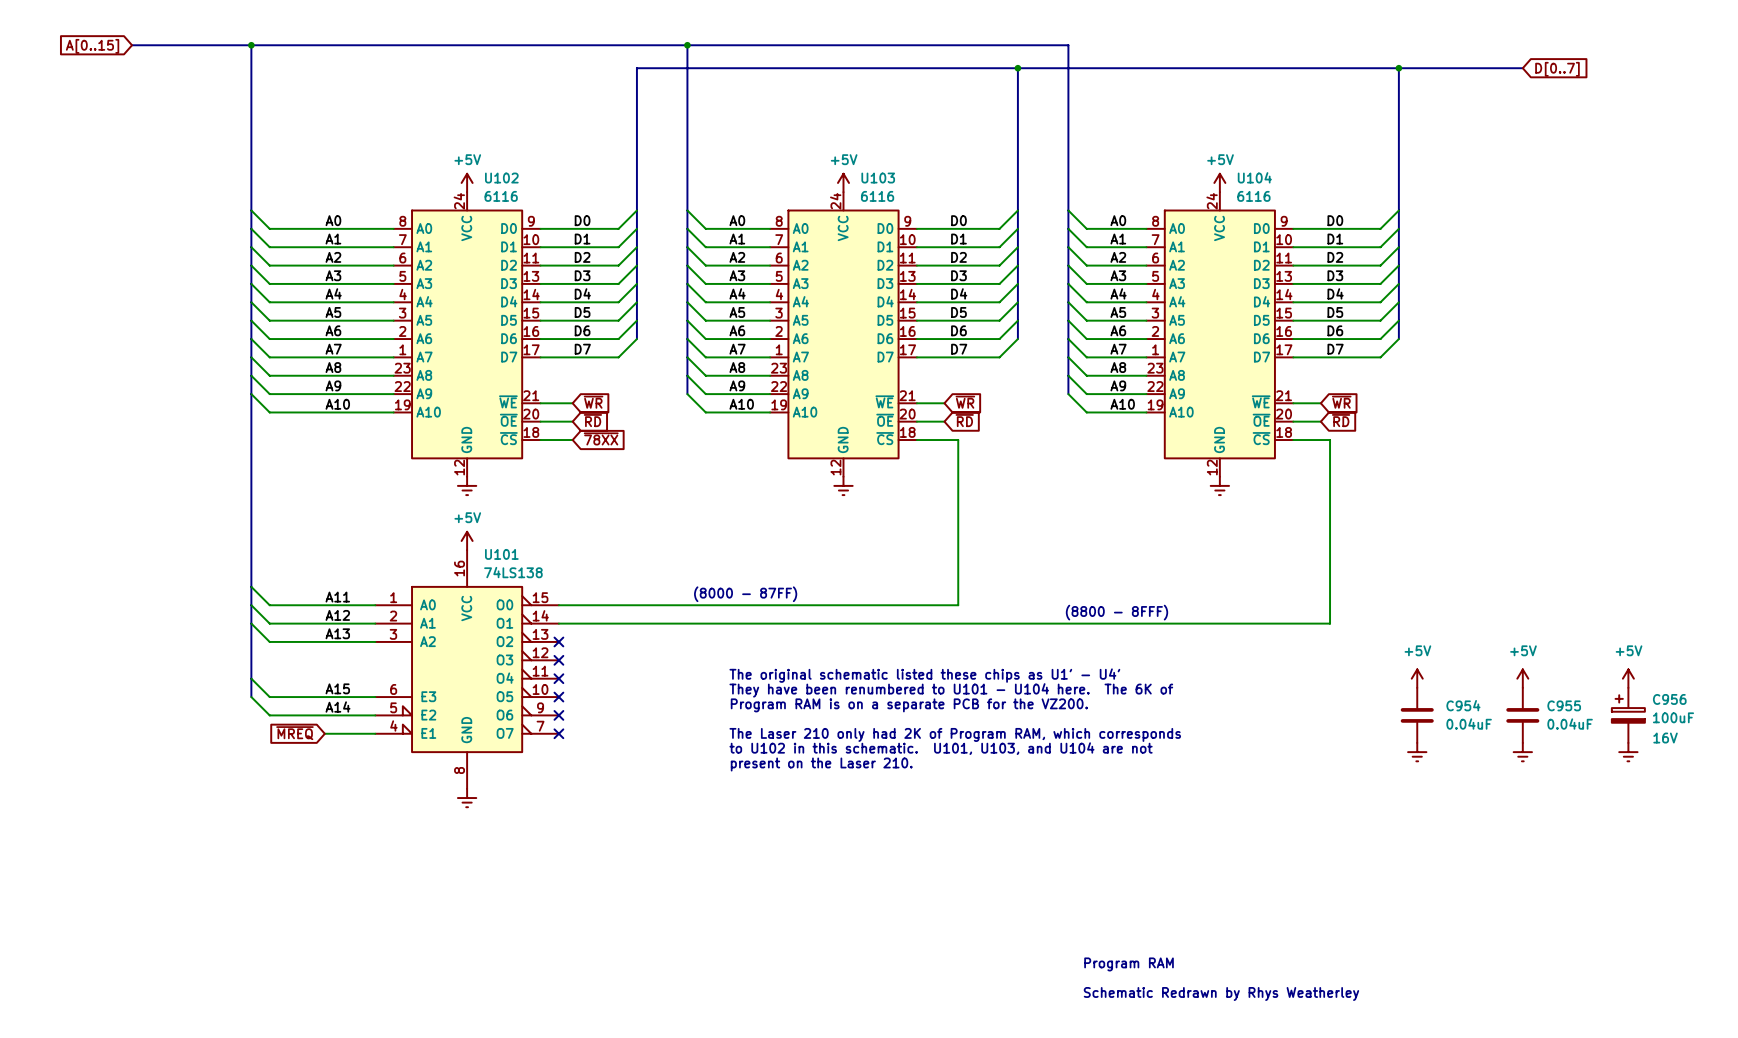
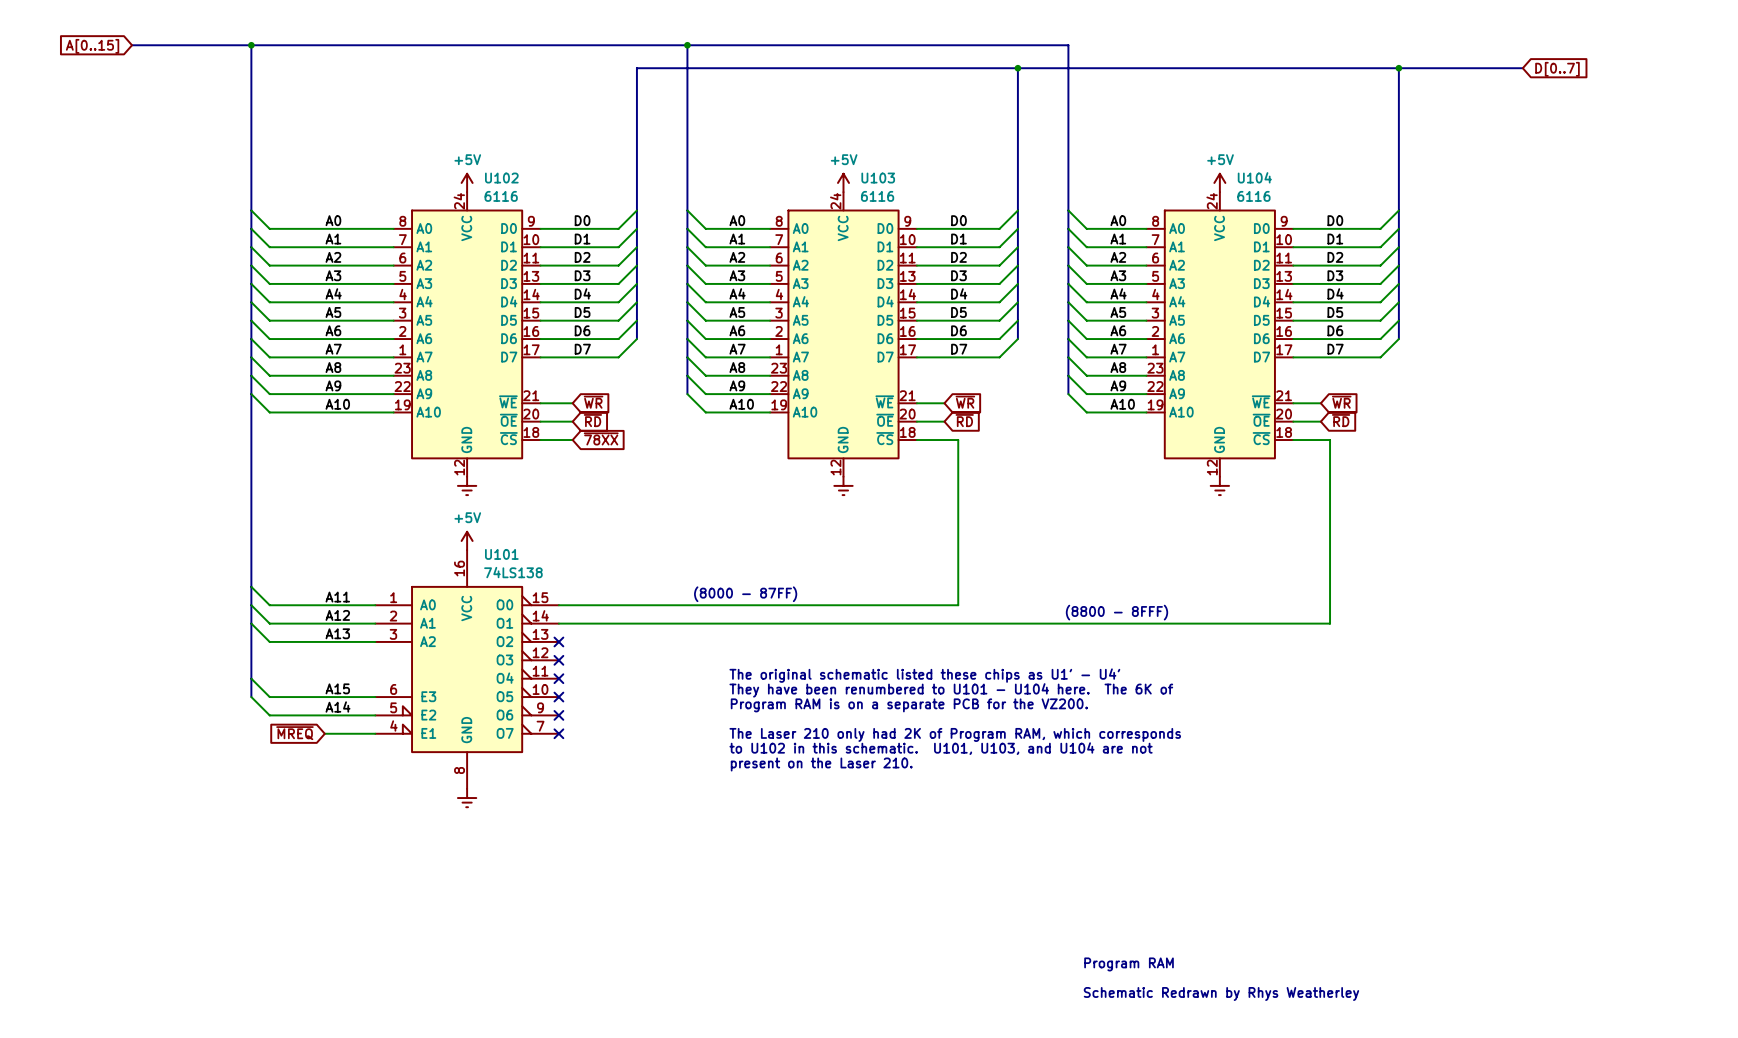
power symbol: +5V (1417, 678) -> none
power symbol: +5V (1522, 678) -> none
power symbol: +5V (1628, 678) -> none
C954: 0.04uF (1417, 715) -> none
C955: 0.04uF (1522, 715) -> none
C956: 100uF (1628, 715) -> none
power symbol: (1417, 752) -> none
power symbol: (1522, 752) -> none
power symbol: (1628, 752) -> none

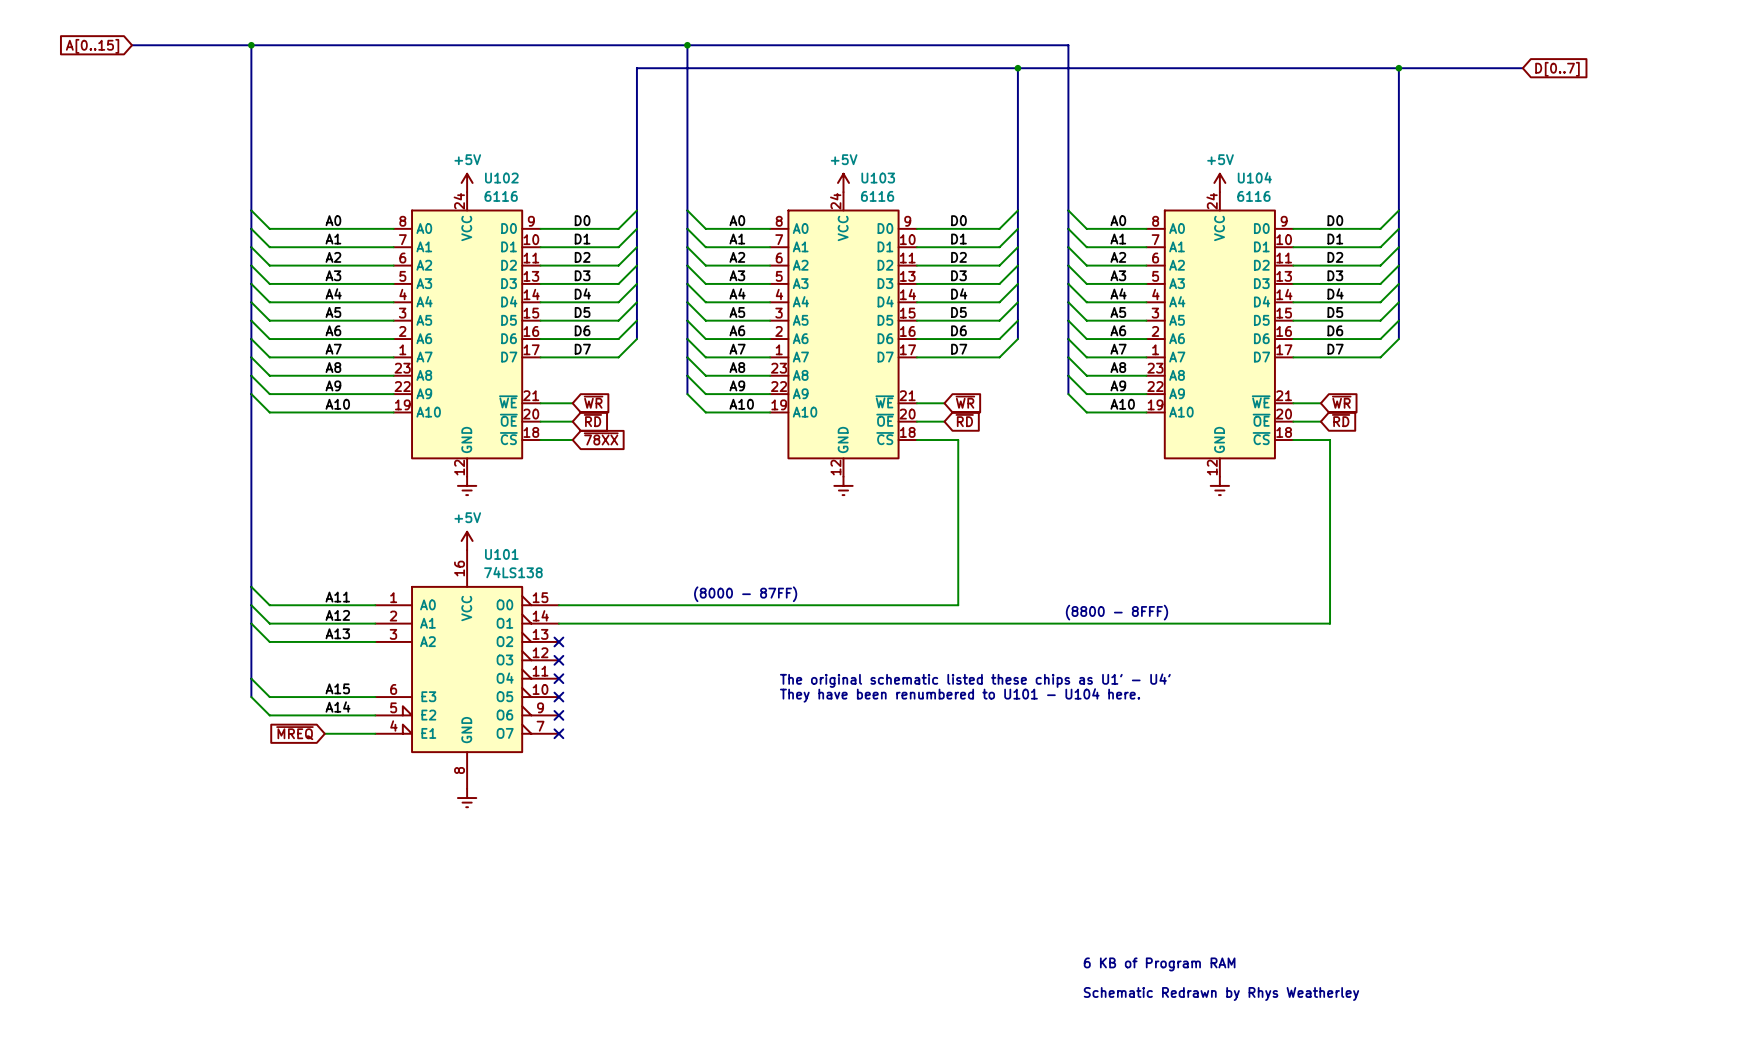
text position: The original schematic listed these chips as U1' - U4' (924, 675) -> The original schematic listed these chips as U1' - U4' (975, 680)
text: They have been renumbered to U101 - U104 here. The 6K of (951, 690) -> They have been renumbered to U101 - U104 here. (960, 695)
text: Program RAM is on a separate PCB for the VZ200. (909, 705) -> none
text: The Laser 210 only had 2K of Program RAM, which corresponds (955, 734) -> none
text: to U102 in this schematic. U101, U103, and U104 are not (941, 748) -> none
text: present on the Laser 210. (821, 764) -> none
text: Program RAM (1129, 964) -> 6 KB of Program RAM (1159, 964)

